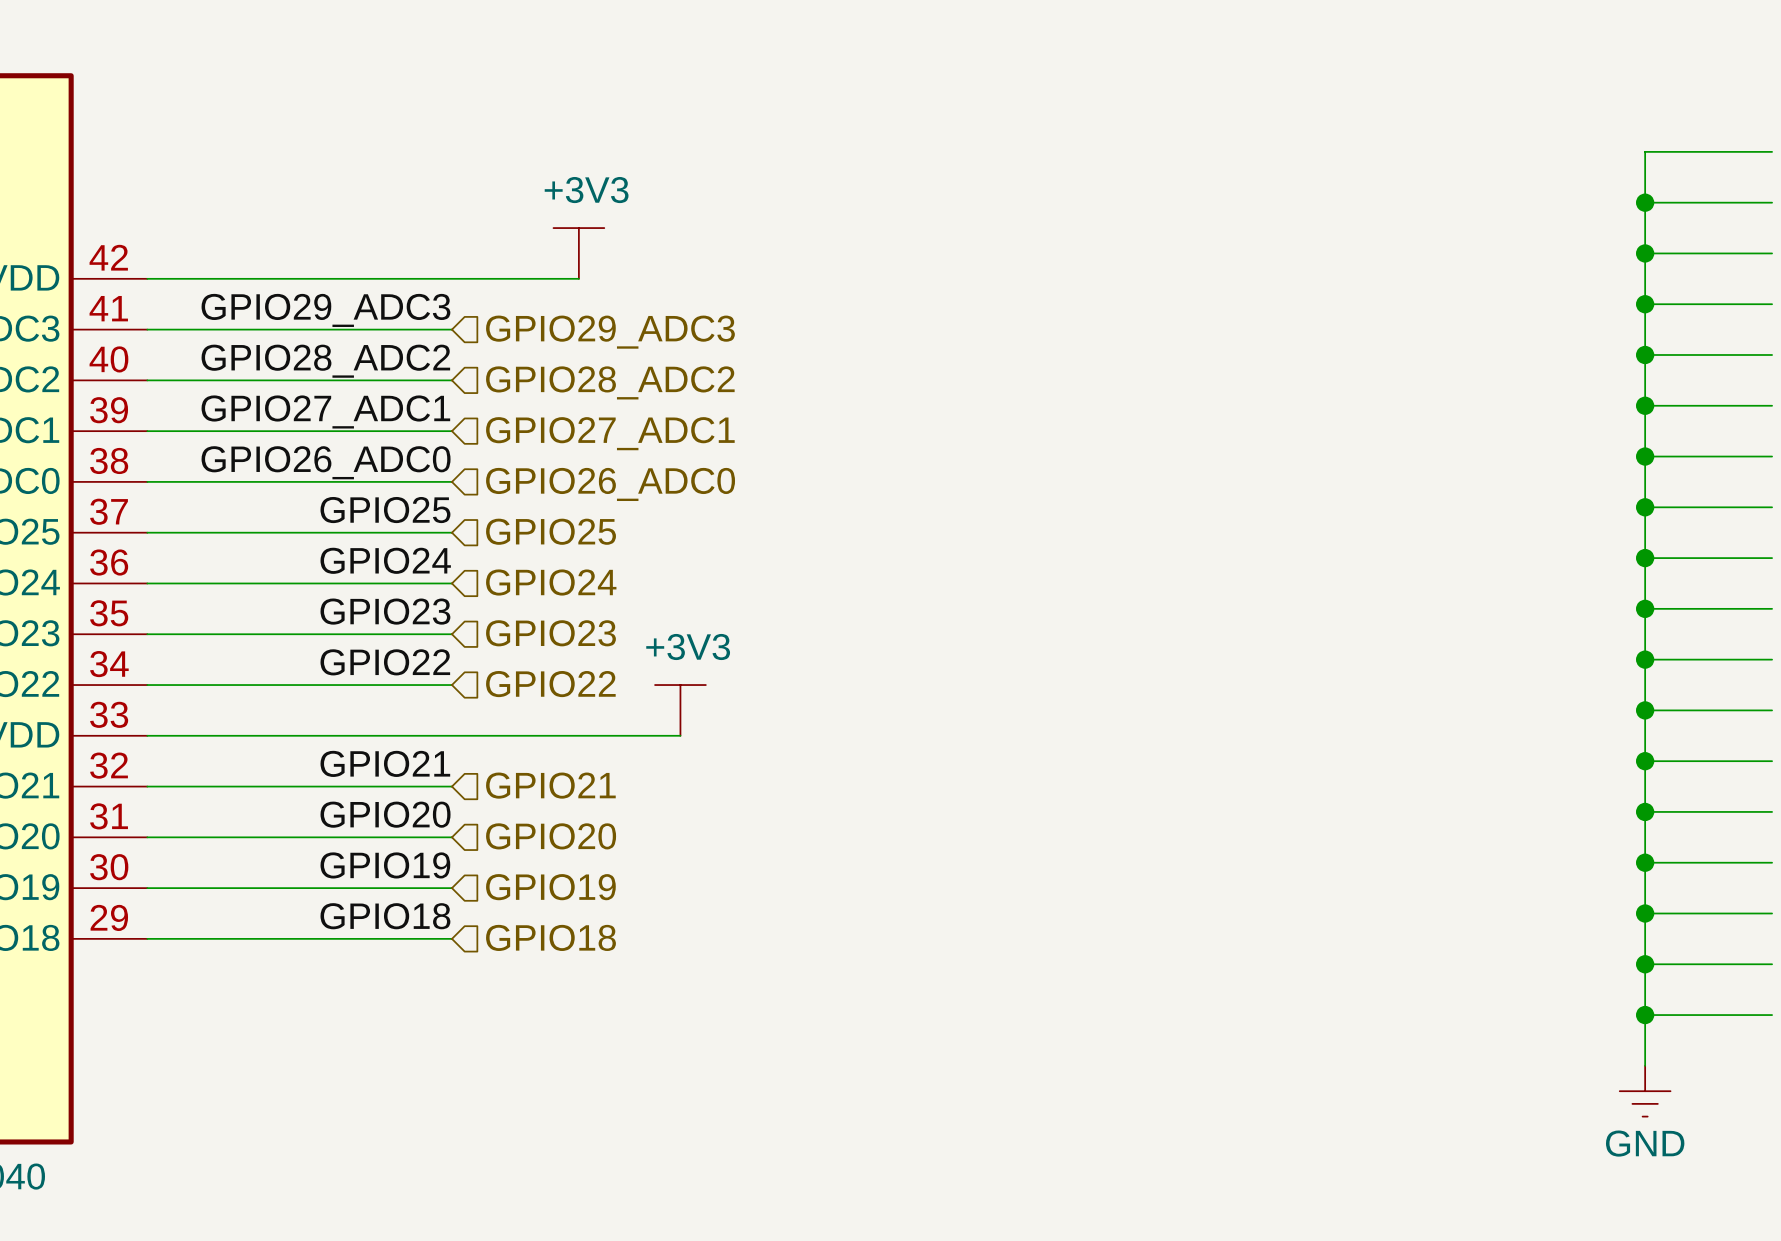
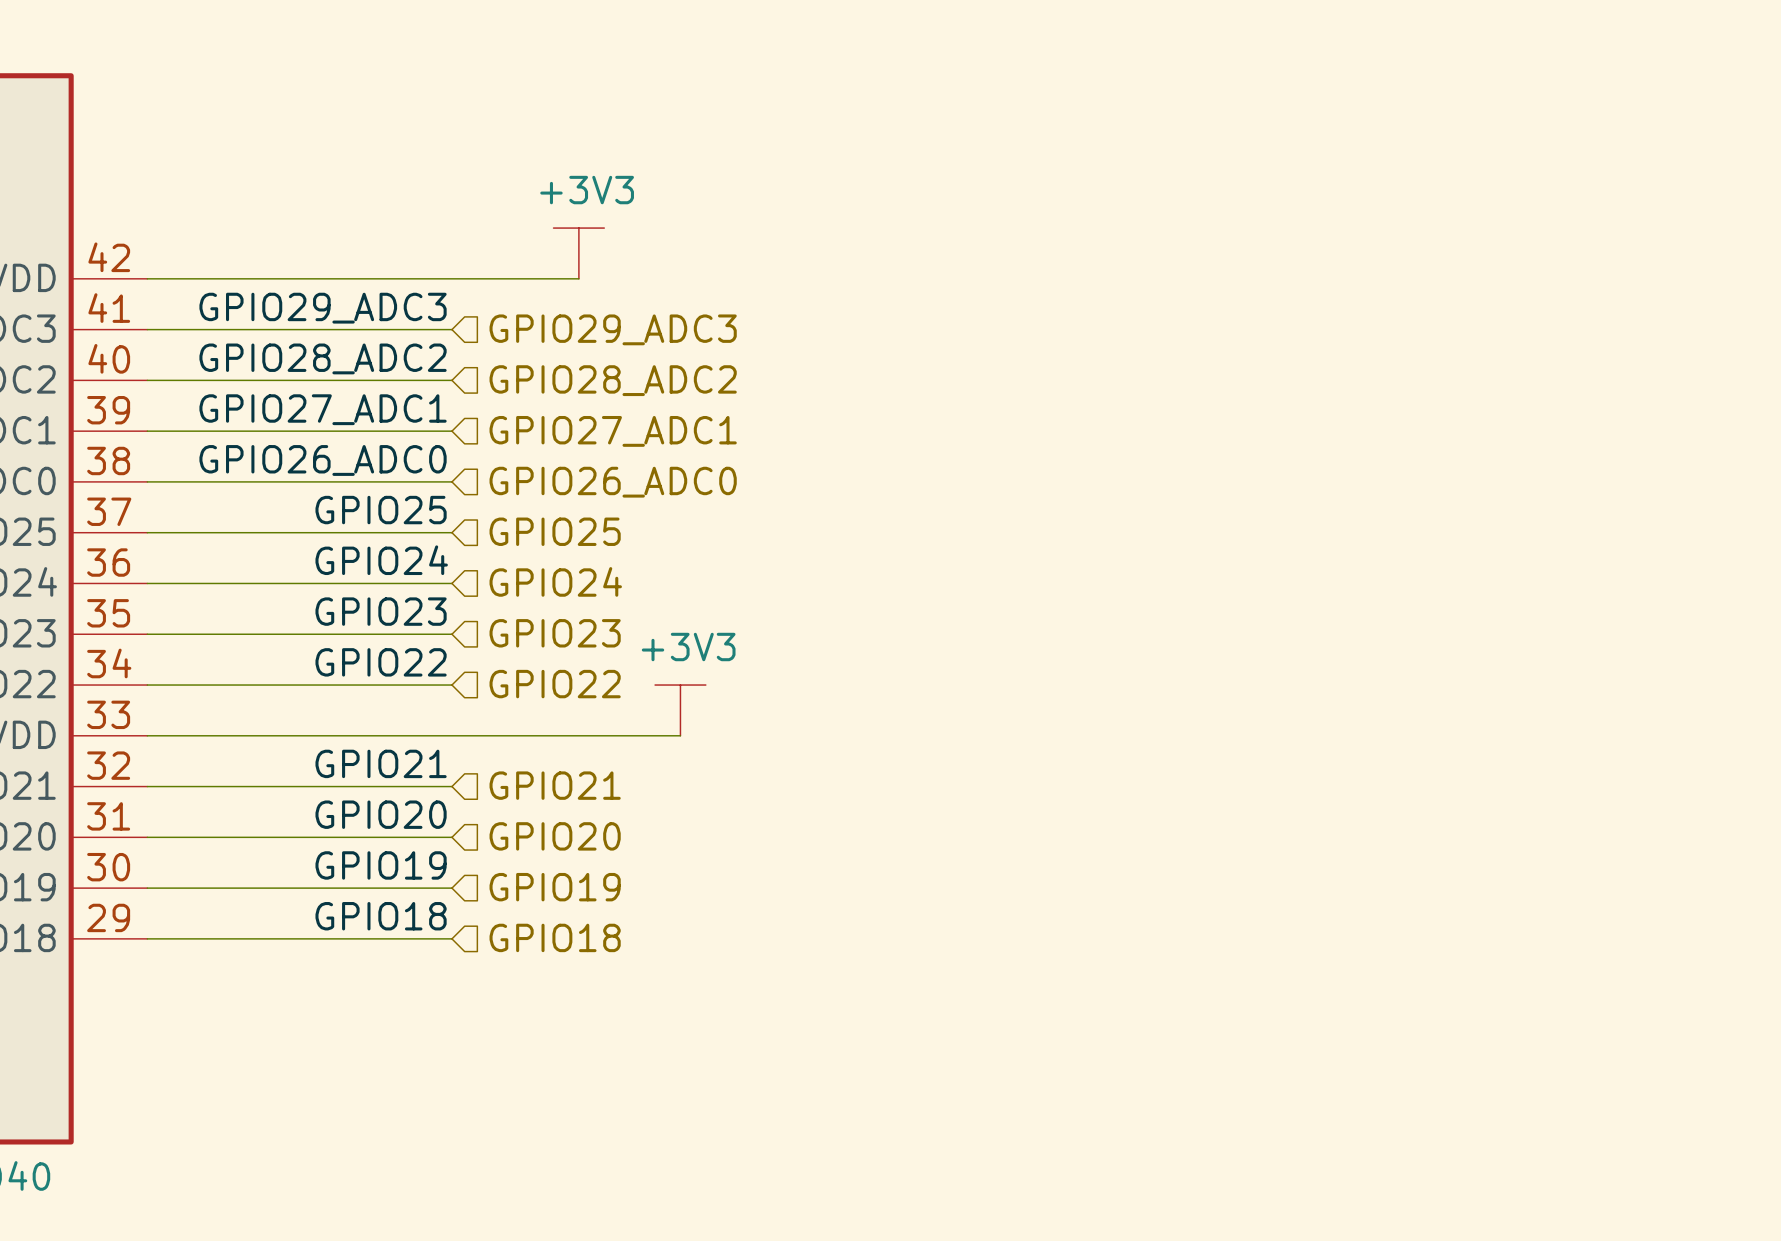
wire: (1772, 151) (1645, 151) (1645, 1065) -> none
wire: (1645, 202) (1772, 202) -> none
junction: (1645, 202) -> none
wire: (1645, 253) (1772, 253) -> none
junction: (1645, 253) -> none
wire: (1645, 304) (1772, 304) -> none
junction: (1645, 304) -> none
wire: (1645, 354) (1772, 354) -> none
junction: (1645, 354) -> none
wire: (1645, 405) (1772, 405) -> none
junction: (1645, 405) -> none
wire: (1645, 456) (1772, 456) -> none
junction: (1645, 456) -> none
wire: (1645, 507) (1772, 507) -> none
junction: (1645, 507) -> none
wire: (1645, 558) (1772, 558) -> none
junction: (1645, 558) -> none
wire: (1645, 608) (1772, 608) -> none
junction: (1645, 608) -> none
wire: (1645, 659) (1772, 659) -> none
junction: (1645, 659) -> none
wire: (1645, 710) (1772, 710) -> none
junction: (1645, 710) -> none
wire: (1645, 761) (1772, 761) -> none
junction: (1645, 761) -> none
wire: (1645, 811) (1772, 811) -> none
junction: (1645, 811) -> none
wire: (1645, 862) (1772, 862) -> none
junction: (1645, 862) -> none
wire: (1645, 913) (1772, 913) -> none
junction: (1645, 913) -> none
wire: (1645, 964) (1772, 964) -> none
junction: (1645, 964) -> none
wire: (1645, 1015) (1772, 1015) -> none
junction: (1645, 1015) -> none
power symbol: GND (1645, 1091) -> none

